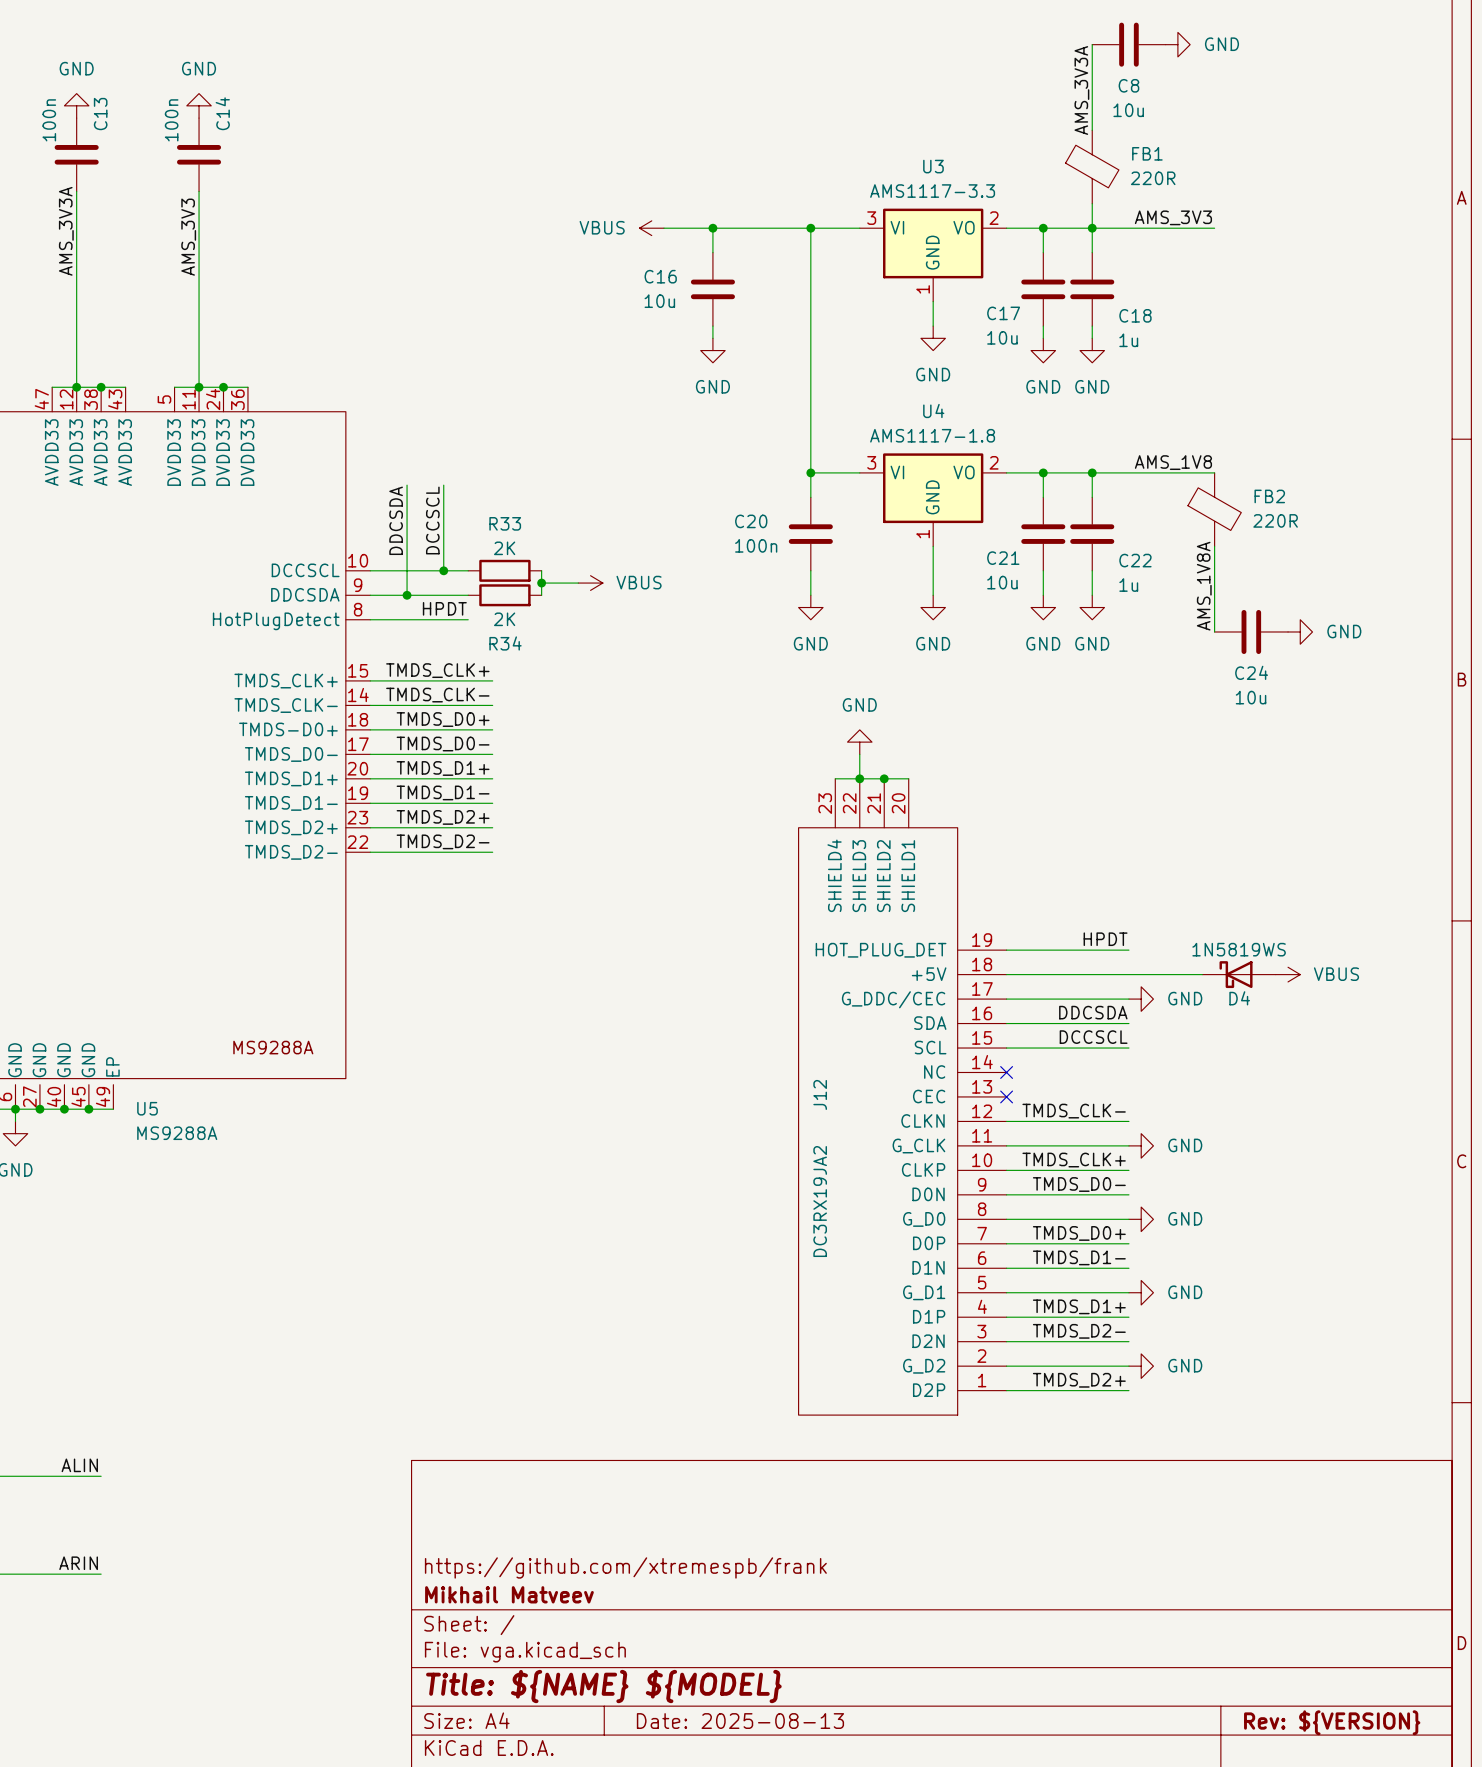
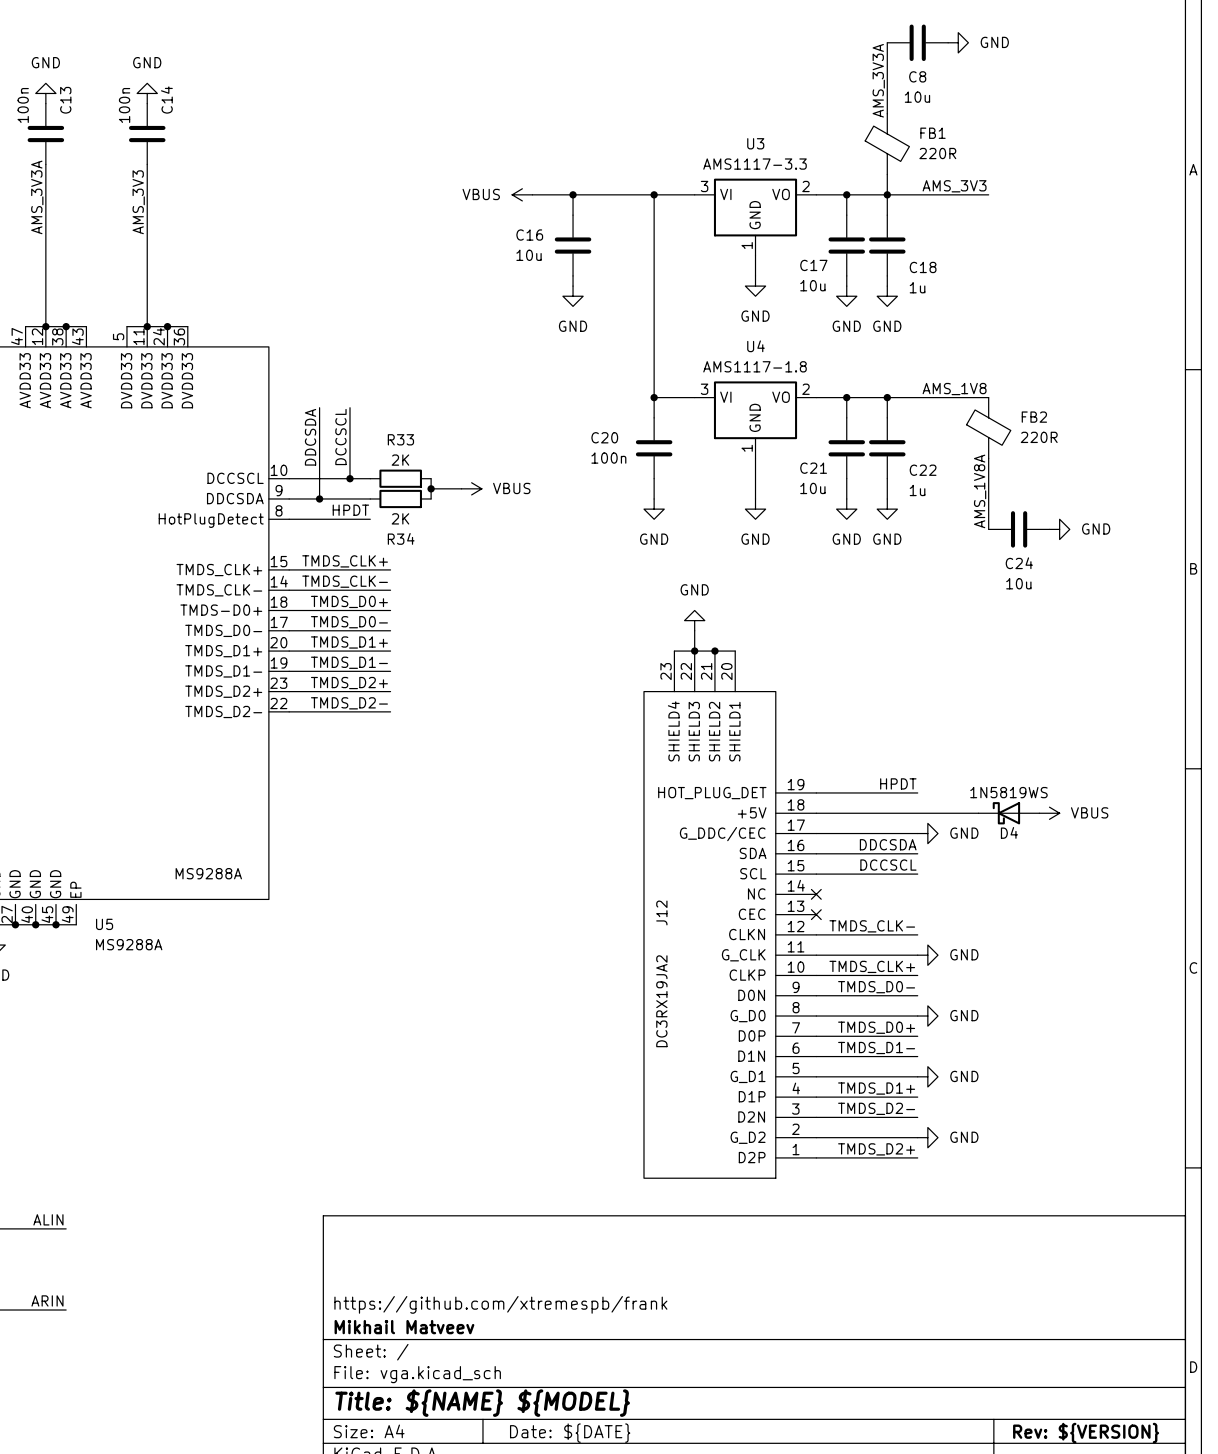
title block: Date: 2025-08-13 (740, 1721) -> Date: ${DATE} (570, 1433)

